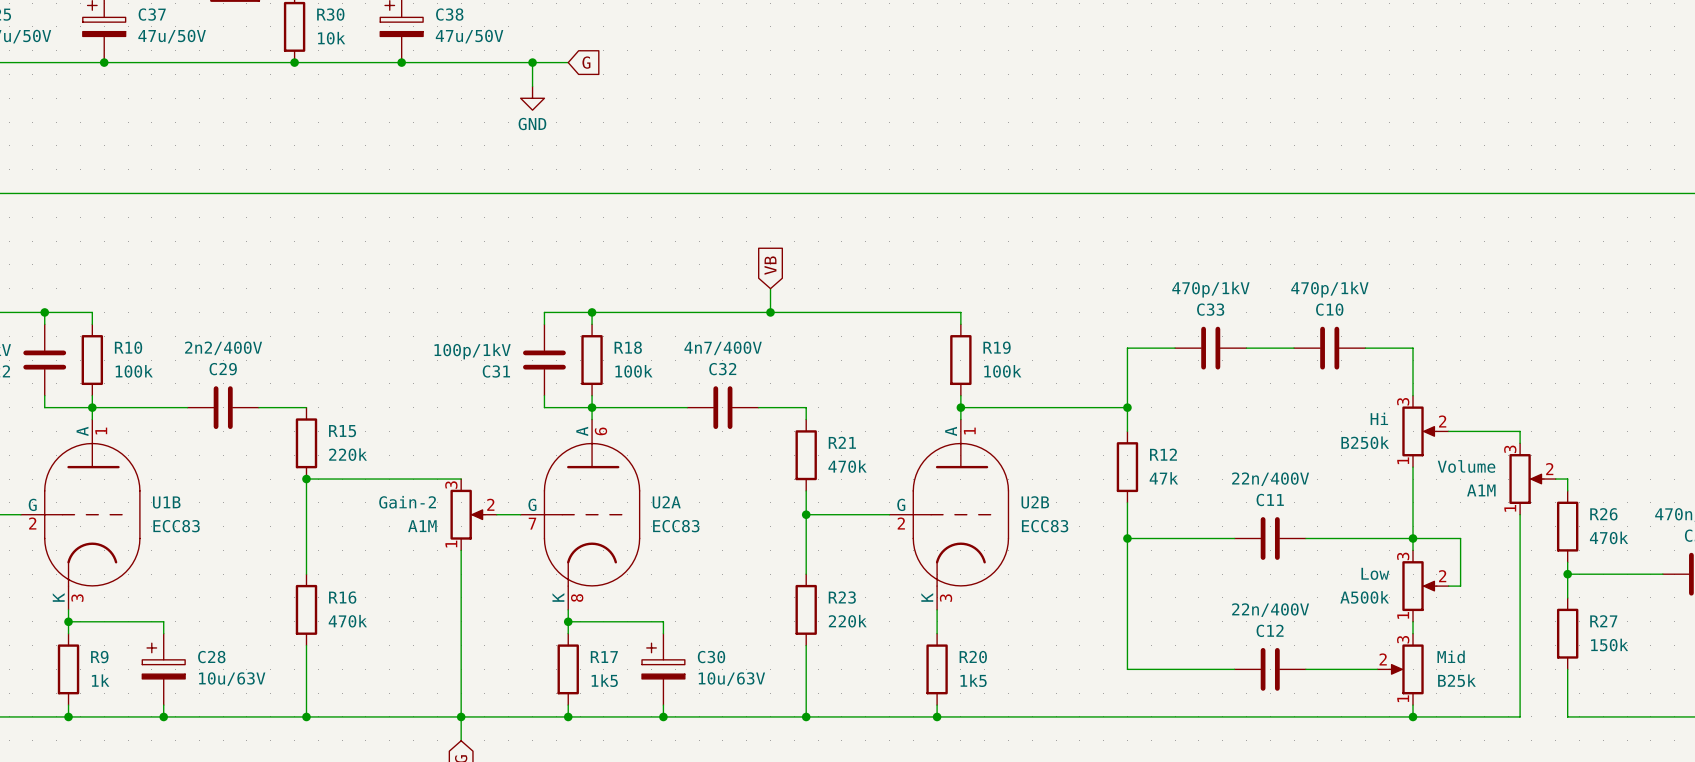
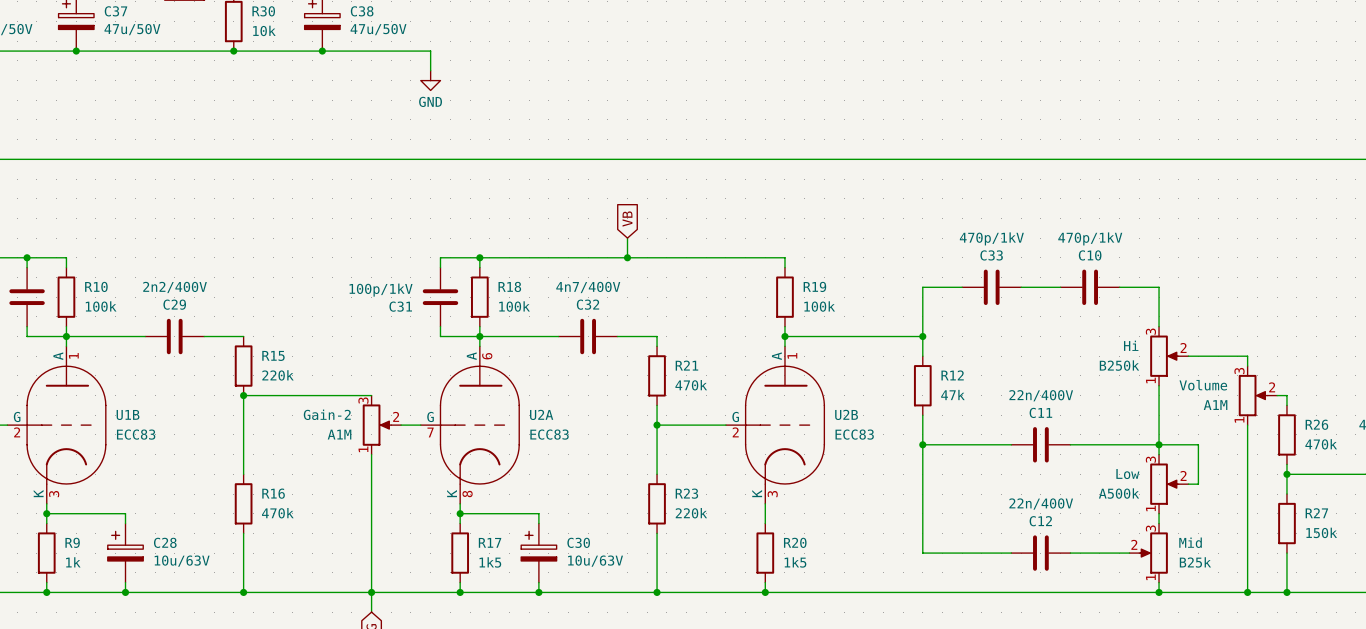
wire: (532, 62) (568, 62) -> none
junction: (532, 62) -> none
global label: G (586, 62) -> none
wire: none -> (1247, 592) (1286, 592)
junction: none -> (1247, 592)
junction: none -> (1286, 592)

